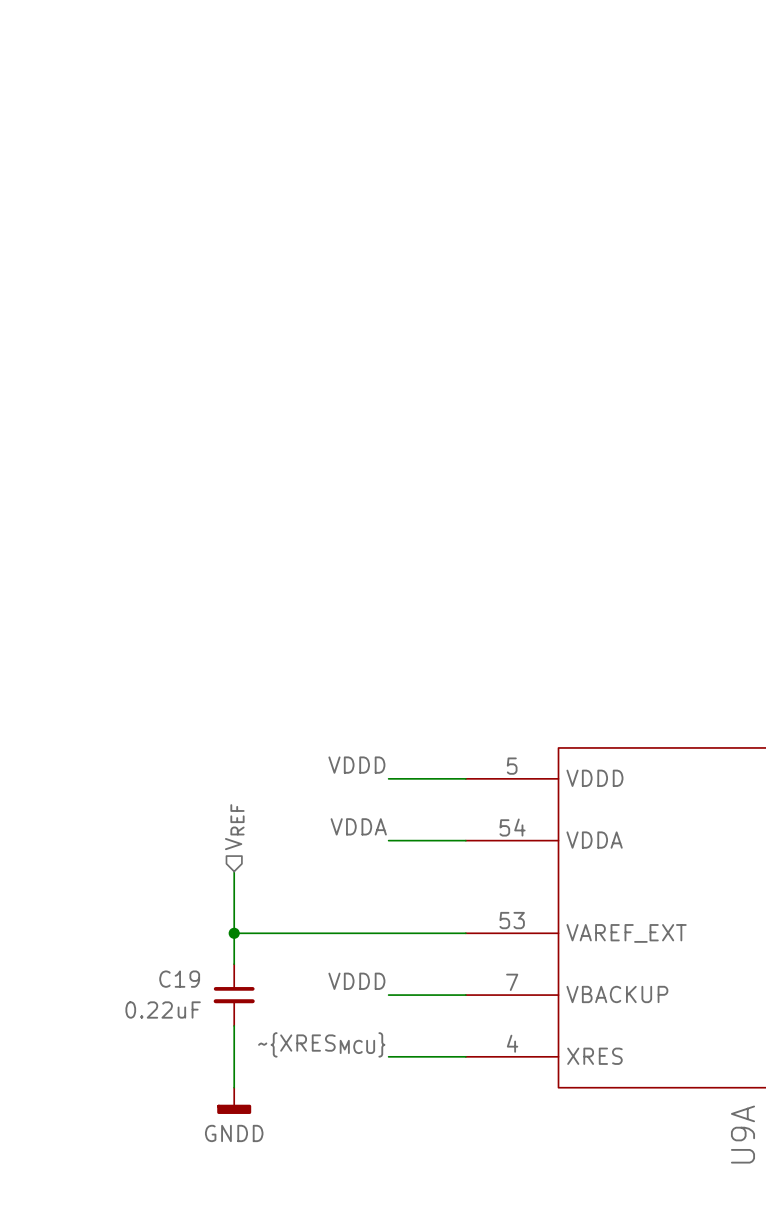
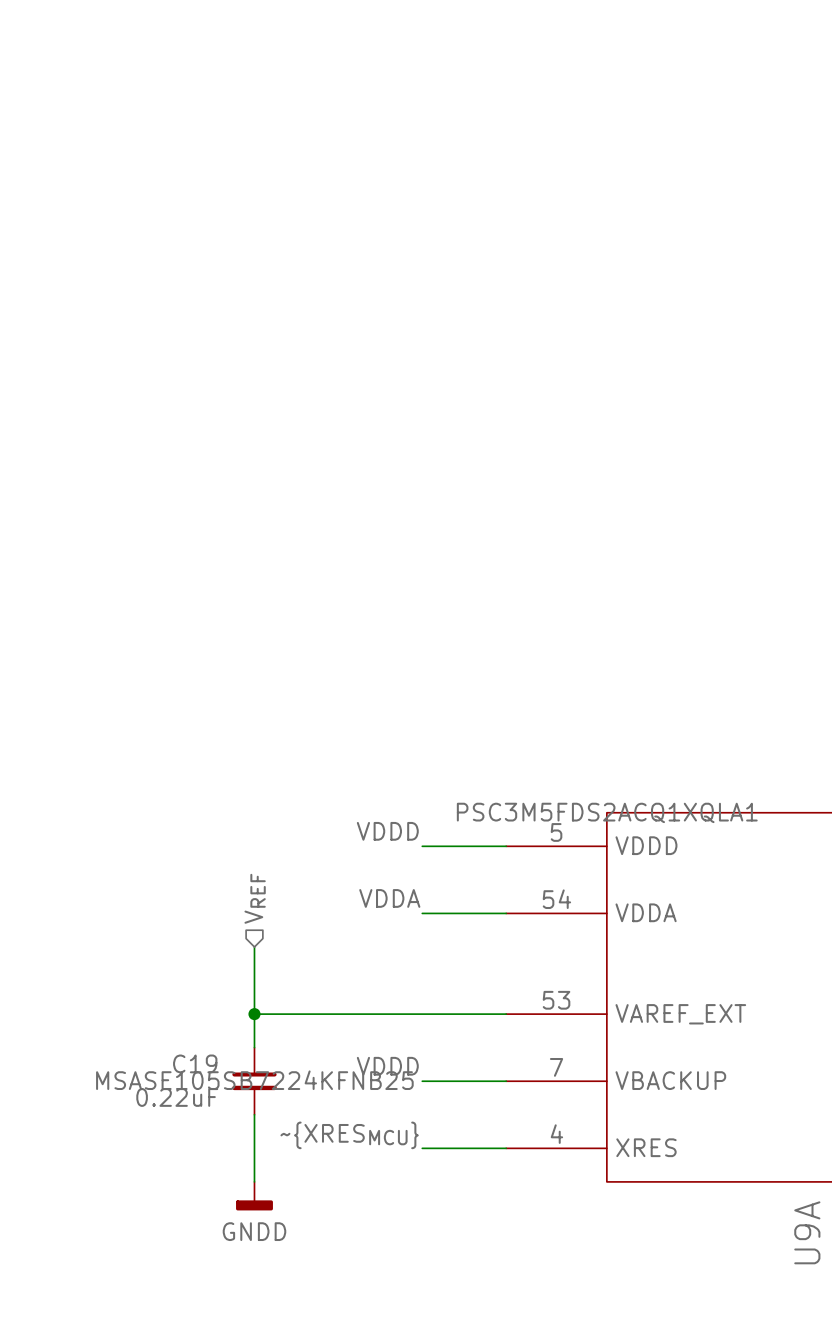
U9A text: none -> PSC3M5FDS2ACQ1XQLA1 (607, 812)
C19 text: none -> MSASE105SB7224KFNB25 (254, 1080)

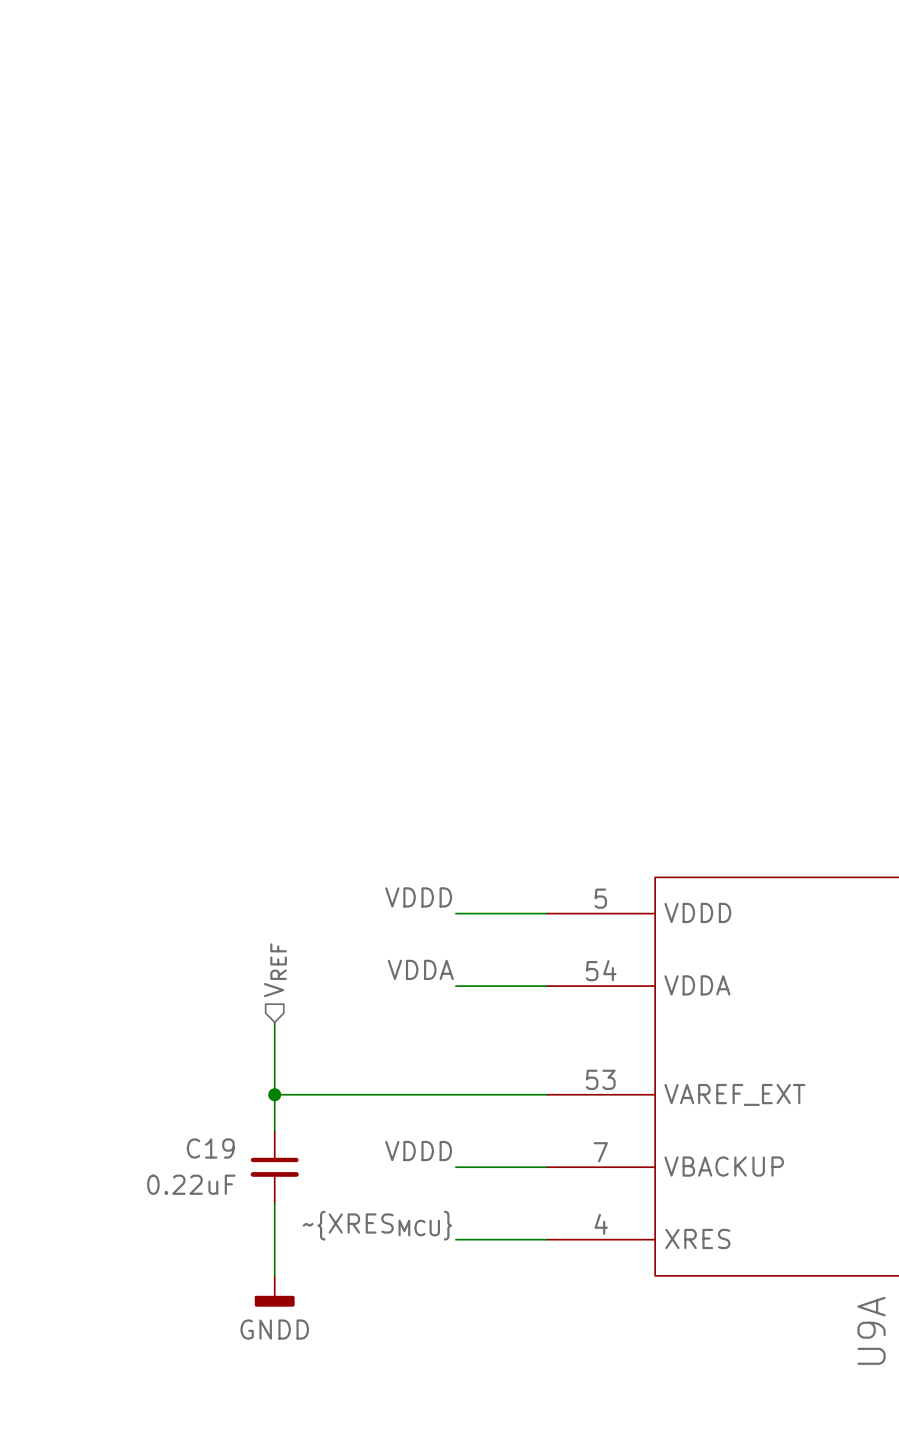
U9A text: PSC3M5FDS2ACQ1XQLA1 (607, 812) -> none
C19 text: MSASE105SB7224KFNB25 (254, 1080) -> none

